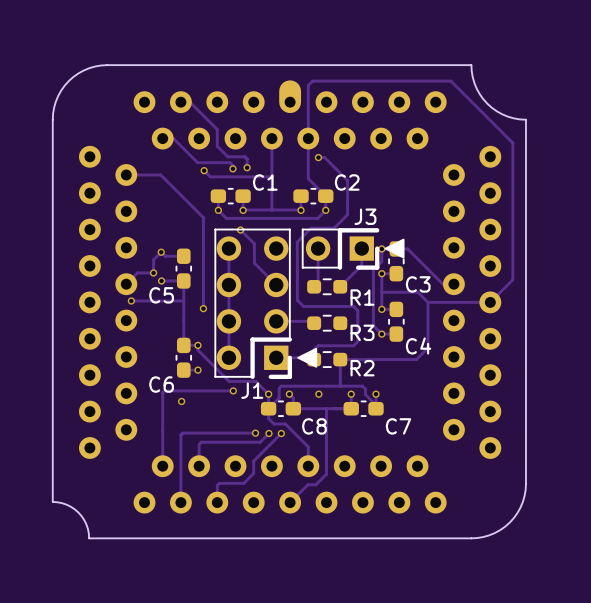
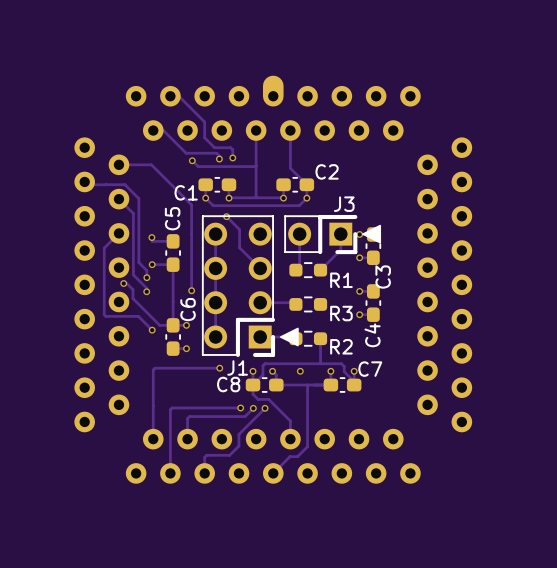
board edge: (107, 65) (471, 65) (474, 83) (487, 103) (507, 116) (525, 119) (525, 483) (520, 507) (505, 526) (489, 535) (471, 538) (89, 538) (86, 524) (78, 512) (66, 504) (52, 501) (53, 113) (61, 90) (73, 77) (89, 68) (107, 65) -> none
track: (308, 138) (308, 85) (312, 81) (450, 81) (512, 143) (512, 279) (490, 302) (427, 302) -> none
track: (318, 157) (324, 157) (347, 180) (347, 214) (334, 228) (311, 228) (297, 242) (297, 300) (303, 306) (353, 306) (357, 310) (357, 341) (353, 345) (318, 345) (314, 349) (314, 359) -> none
via: (318, 157) -> none
C1 name position: C1 (265, 182) -> C1 (186, 192)
track: none -> (84, 181) (88, 181) (91, 184) (124, 184) (138, 198) (138, 262) (146, 270) (146, 277)
track: none -> (118, 199) (133, 213) (133, 274) (146, 288) (146, 291)
track: none -> (118, 233) (104, 248) (104, 314) (105, 316) (138, 316) (152, 330)
track: (381, 248) (381, 261) (373, 270) (373, 325) (381, 334) -> none
track: (396, 248) (407, 248) (442, 284) (453, 284) -> none
track: (165, 256) (161, 252) (153, 259) (153, 272) (137, 272) (126, 284) -> (155, 241) (152, 241)
via: (153, 272) -> none
track: (381, 273) (381, 309) -> none
C3 name rotation: 0° (418, 284) -> 90° counterclockwise (383, 277)
track: (381, 291) (417, 292) (427, 302) -> none
via: none -> (146, 277)
C5 name rotation: 0° (161, 295) -> 90° counterclockwise (172, 218)
C5 name position: C5 (161, 295) -> C5 (172, 218)
track: (134, 300) (183, 300) -> (126, 283) (133, 289) (133, 298) (159, 325) (173, 325)
track: (427, 302) (427, 348) (416, 359) (340, 359) -> none
via: none -> (146, 291)
track: (197, 345) (197, 350) (229, 381) (255, 381) (268, 394) -> none
C4 name rotation: 0° (418, 345) -> 90° counterclockwise (372, 335)
via: none -> (152, 330)
C6 name rotation: 0° (161, 384) -> 90° counterclockwise (188, 309)
C6 name position: C6 (161, 384) -> C6 (188, 309)
via: (181, 401) -> none
C8 name position: C8 (314, 426) -> C8 (228, 384)
C7 name position: C7 (398, 426) -> C7 (370, 369)

